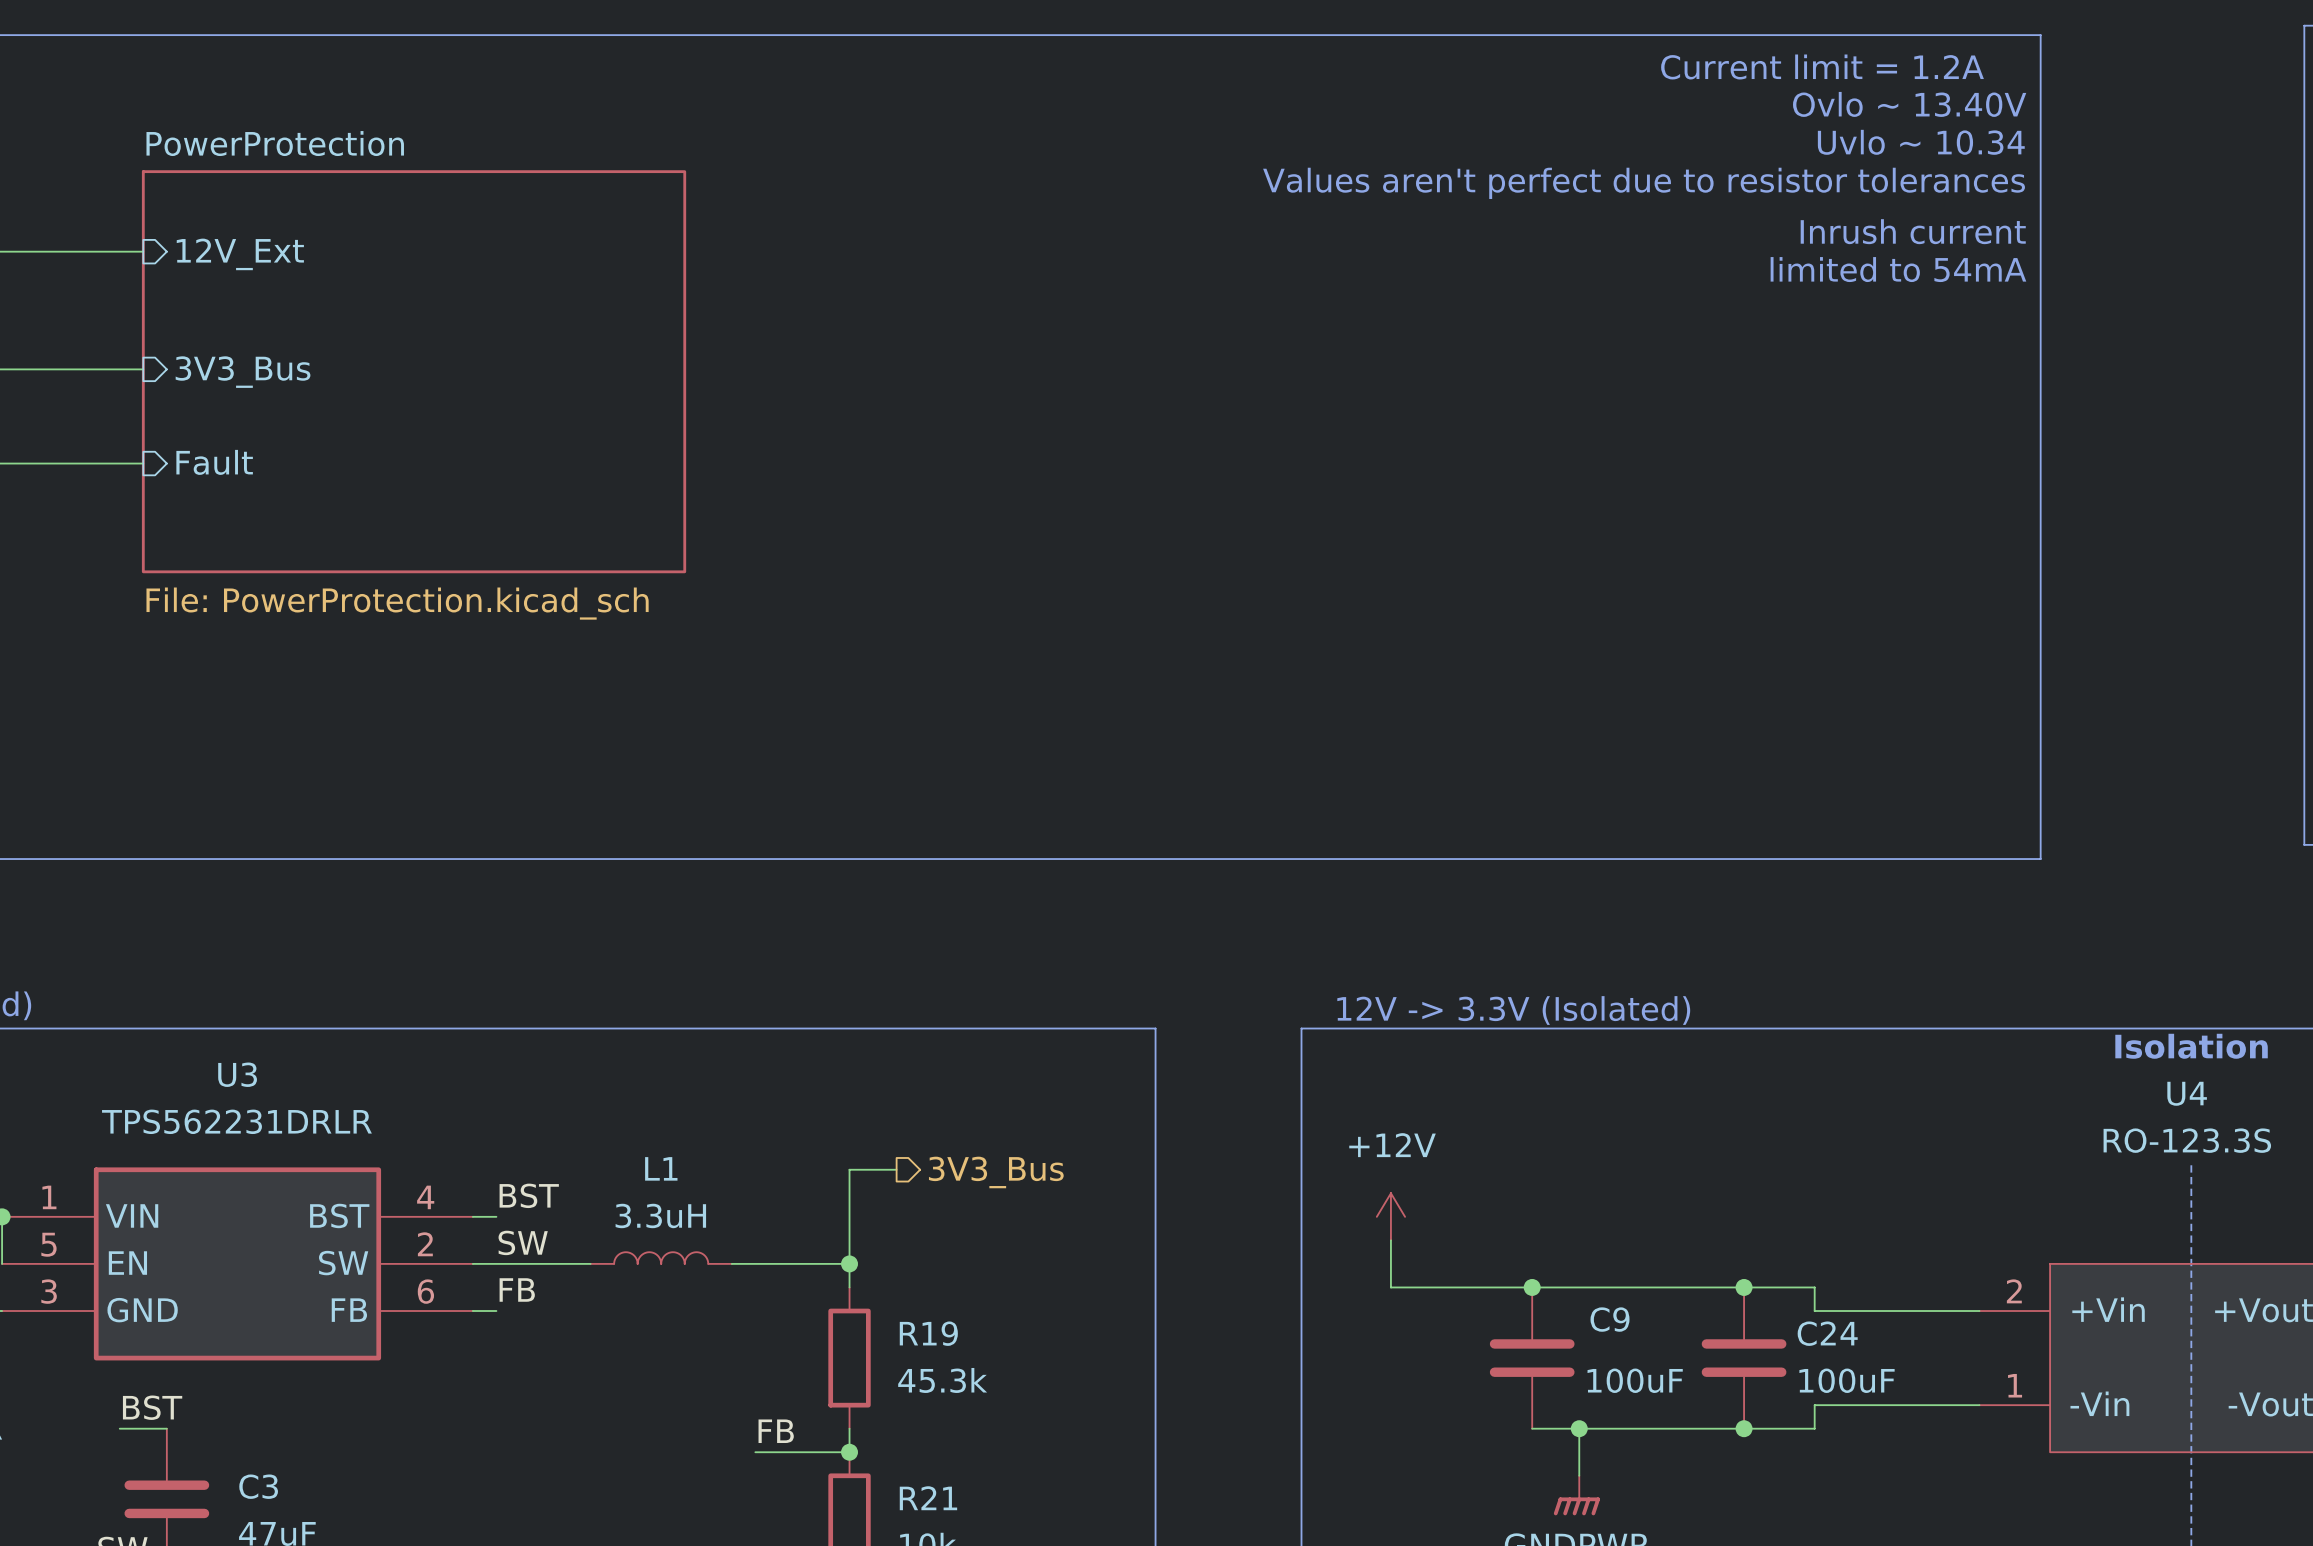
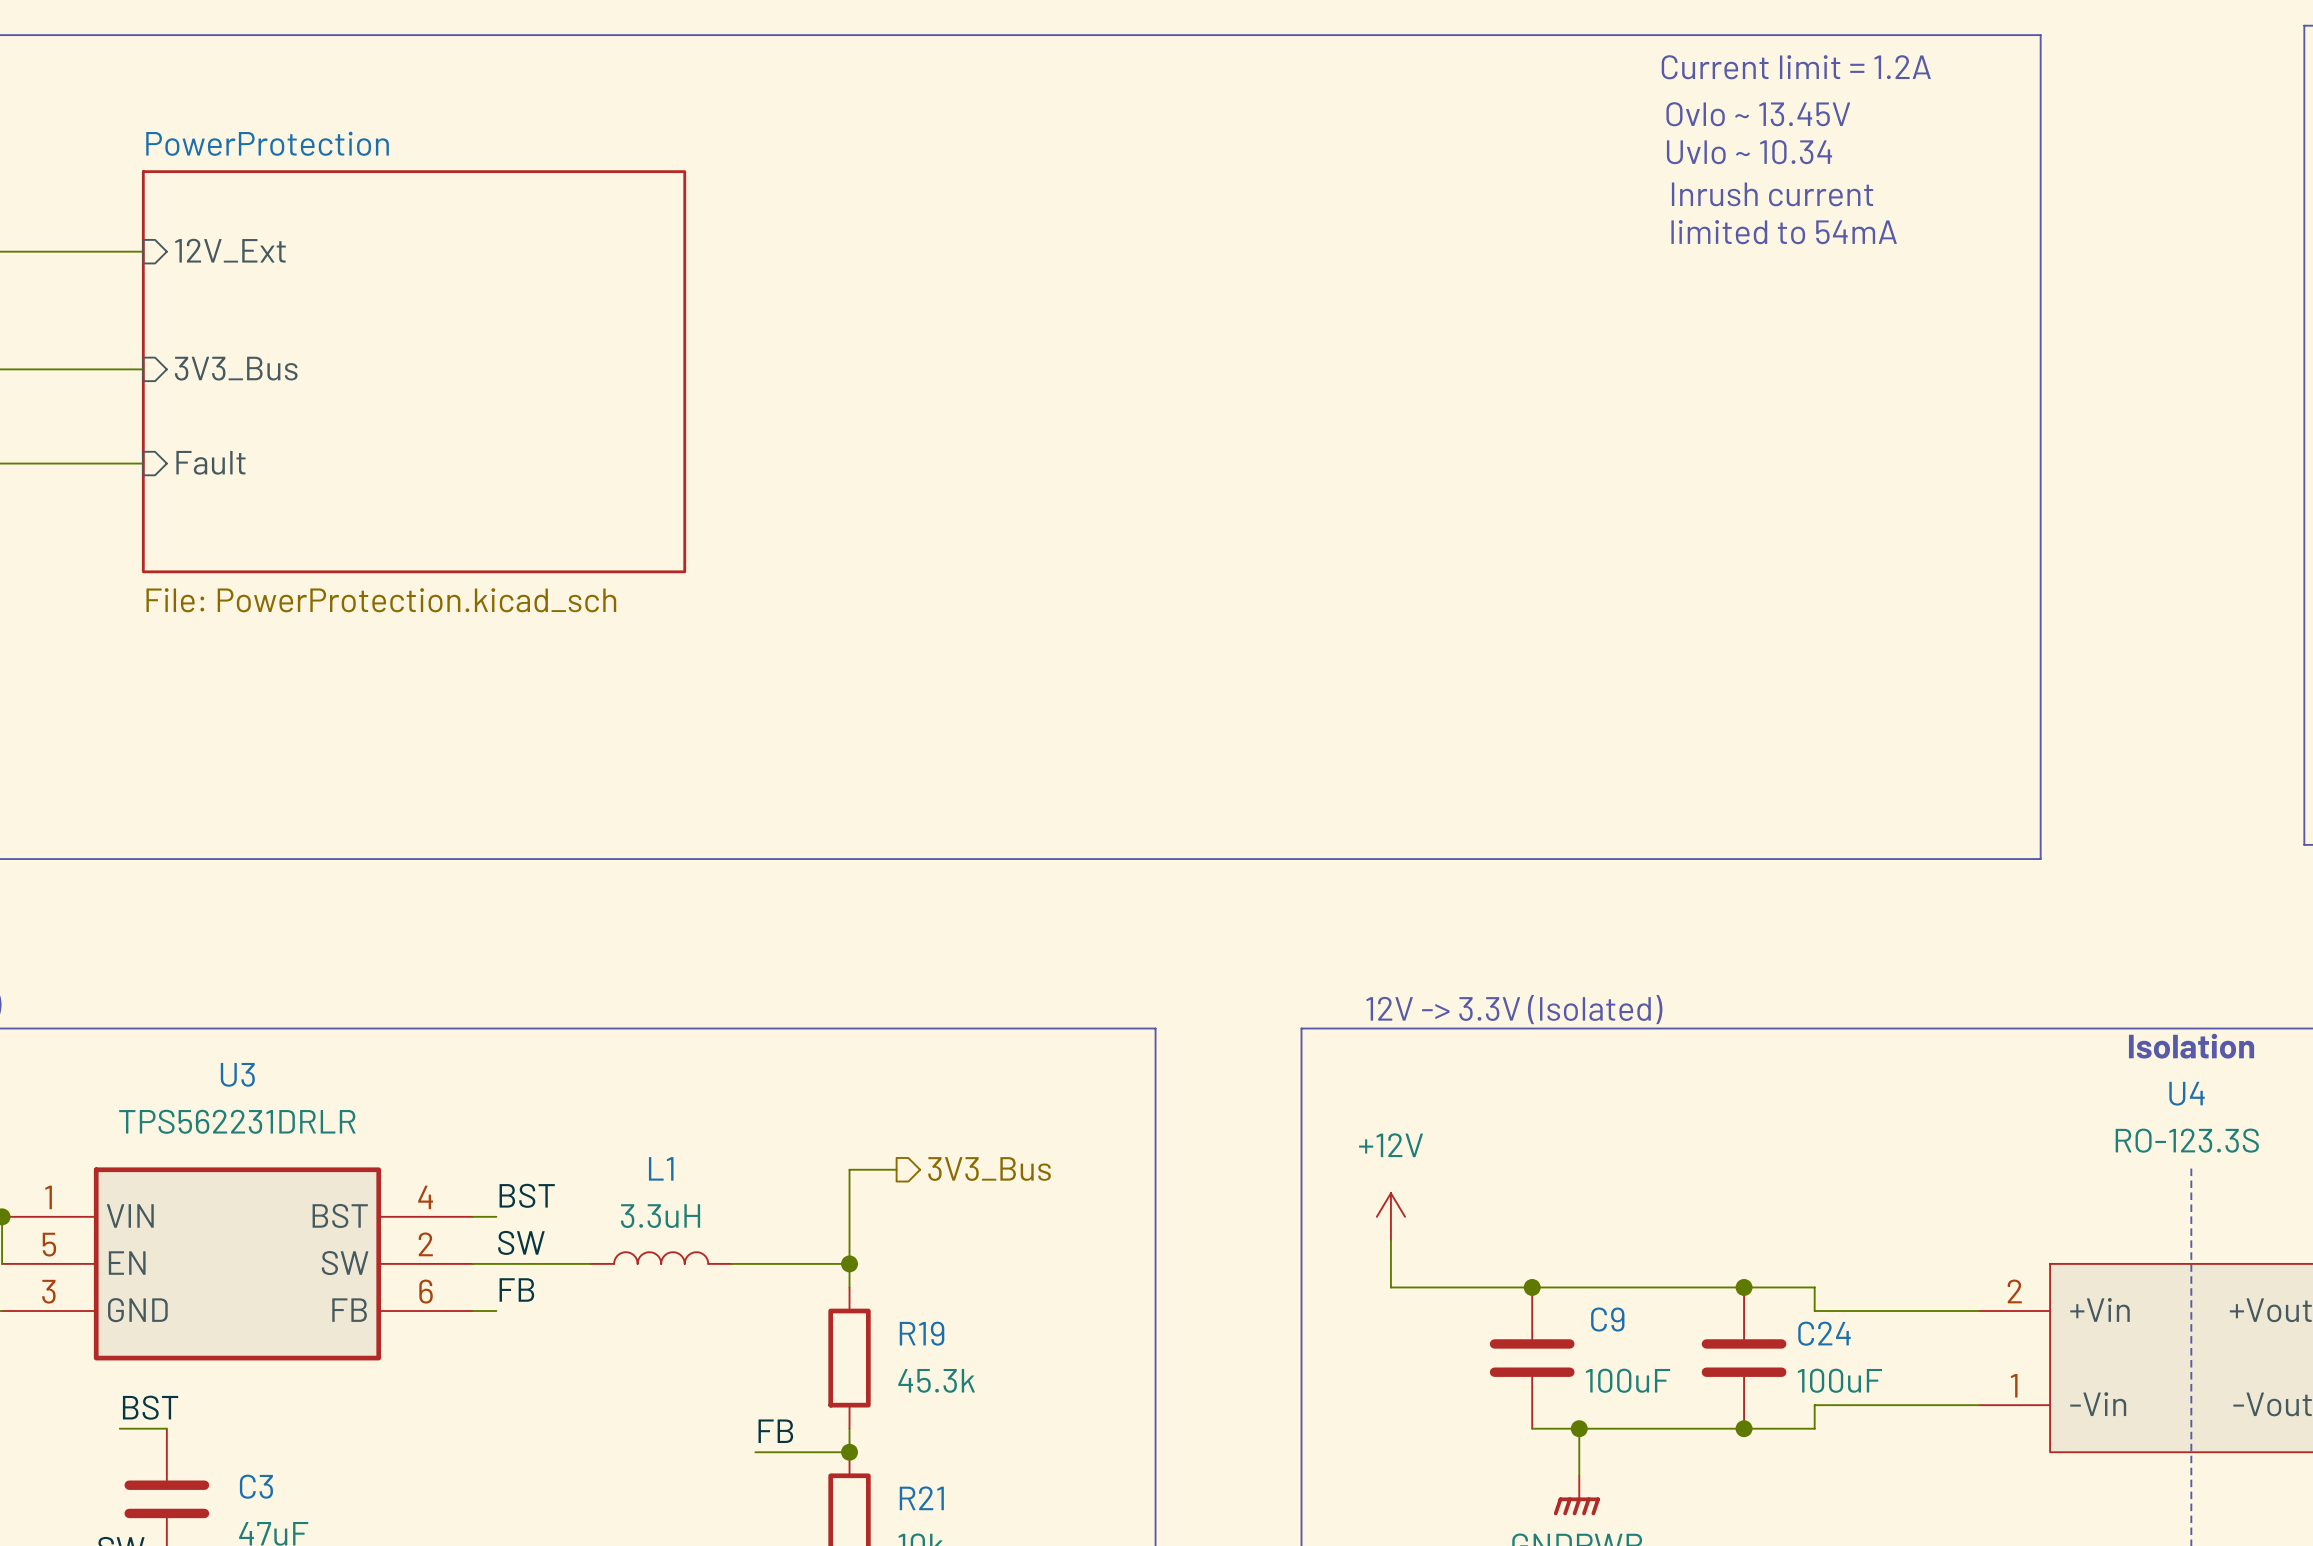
text: Ovlo ~ 13.40V (1909, 104) -> Ovlo ~ 13.45V (1758, 114)
text position: Uvlo ~ 10.34 (1921, 142) -> Uvlo ~ 10.34 (1749, 152)
text: Values aren't perfect due to resistor tolerances (1644, 183) -> none
text position: Inrush current (1913, 231) -> Inrush current (1772, 194)
text position: limited to 54mA (1898, 269) -> limited to 54mA (1784, 232)

